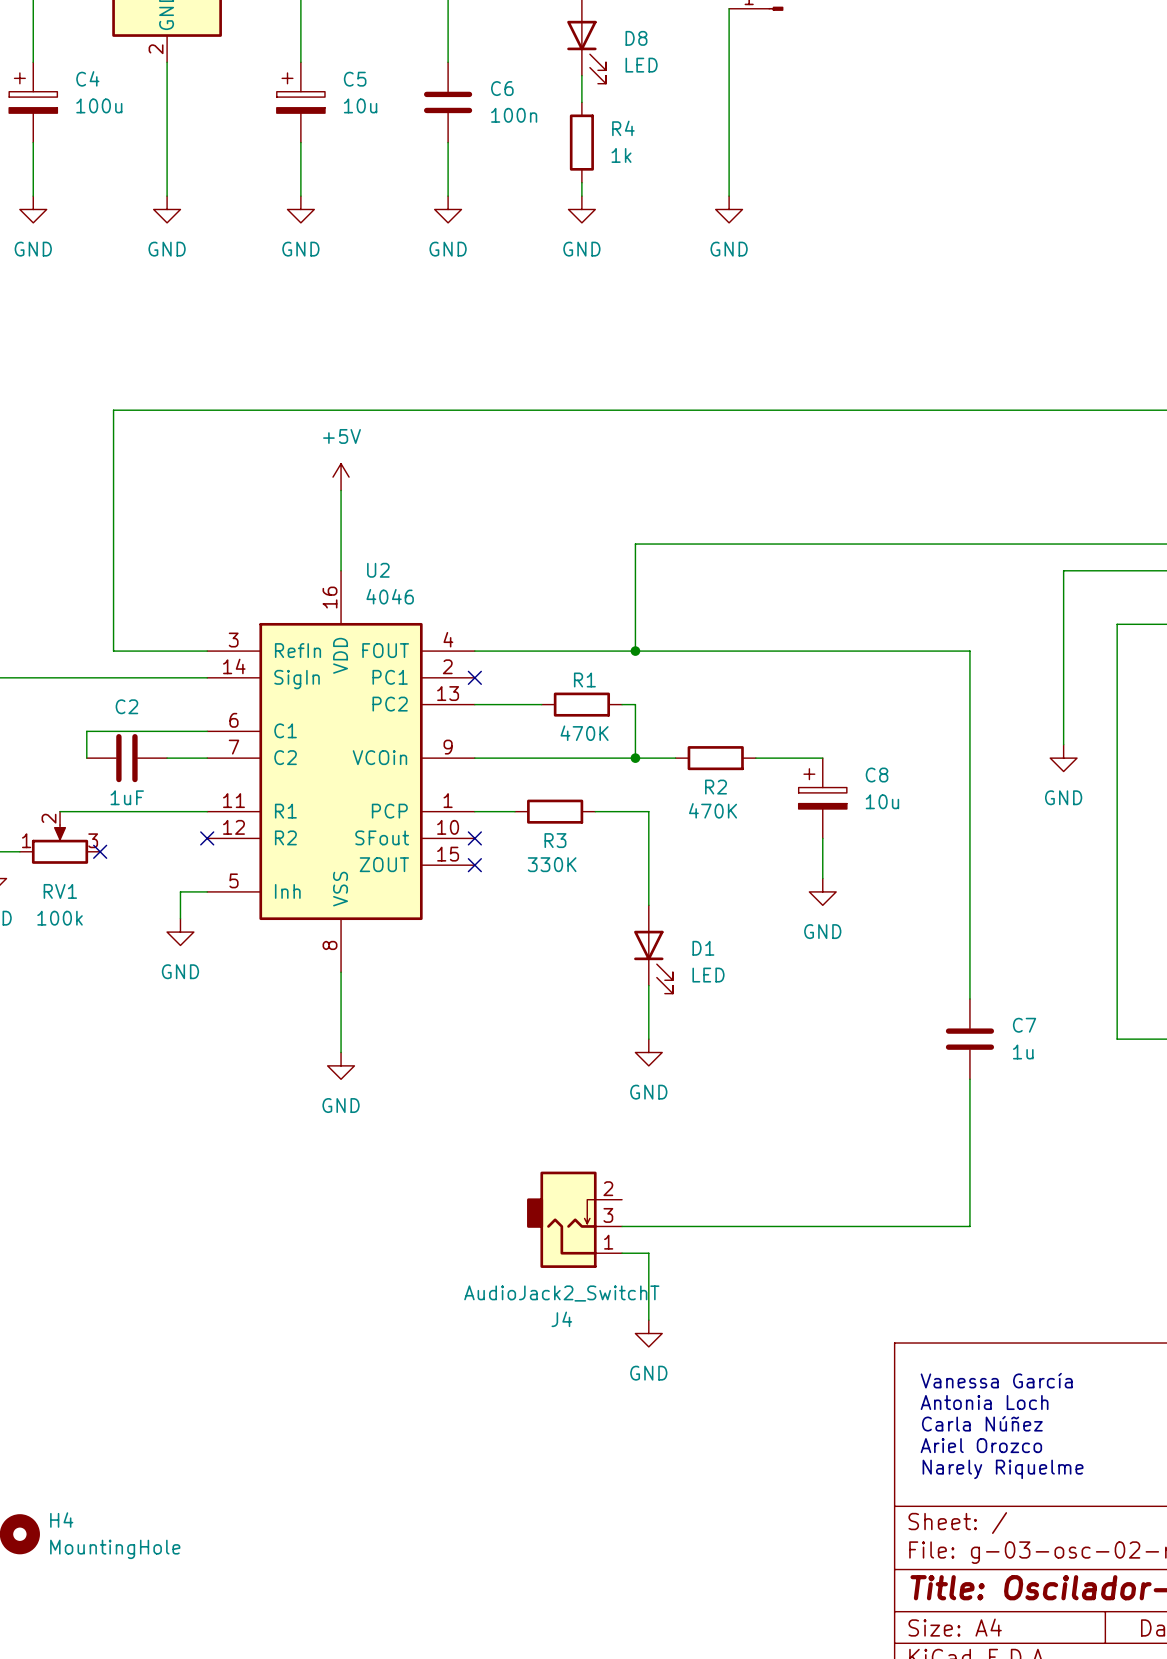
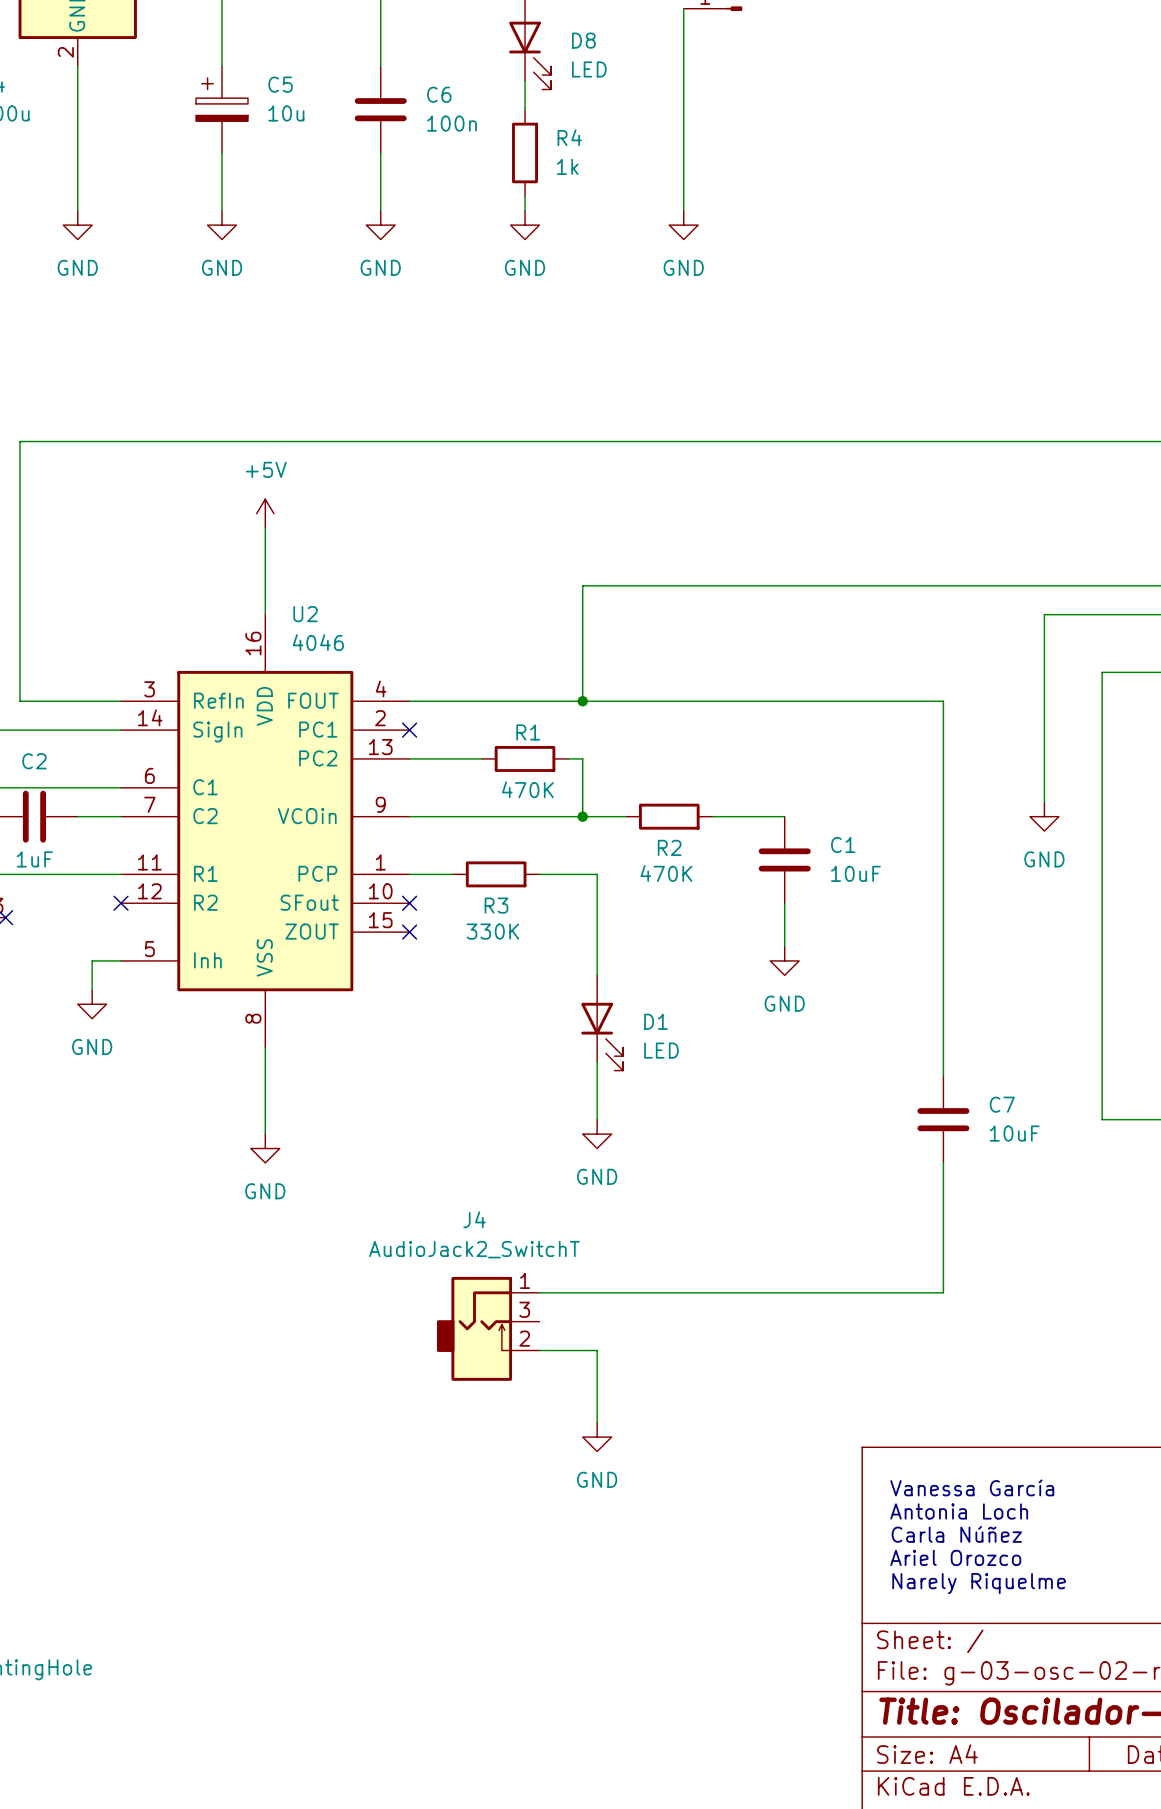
C8: 10u (822, 798) -> none
C1: none -> 10uF (784, 859)
C7 value: 1u (1023, 1052) -> 10uF (1014, 1133)
wire: (969, 1199) (969, 1226) (622, 1226) -> (943, 1292) (539, 1292)
J4 flip: as is (561, 1219) -> up-down (474, 1328)

